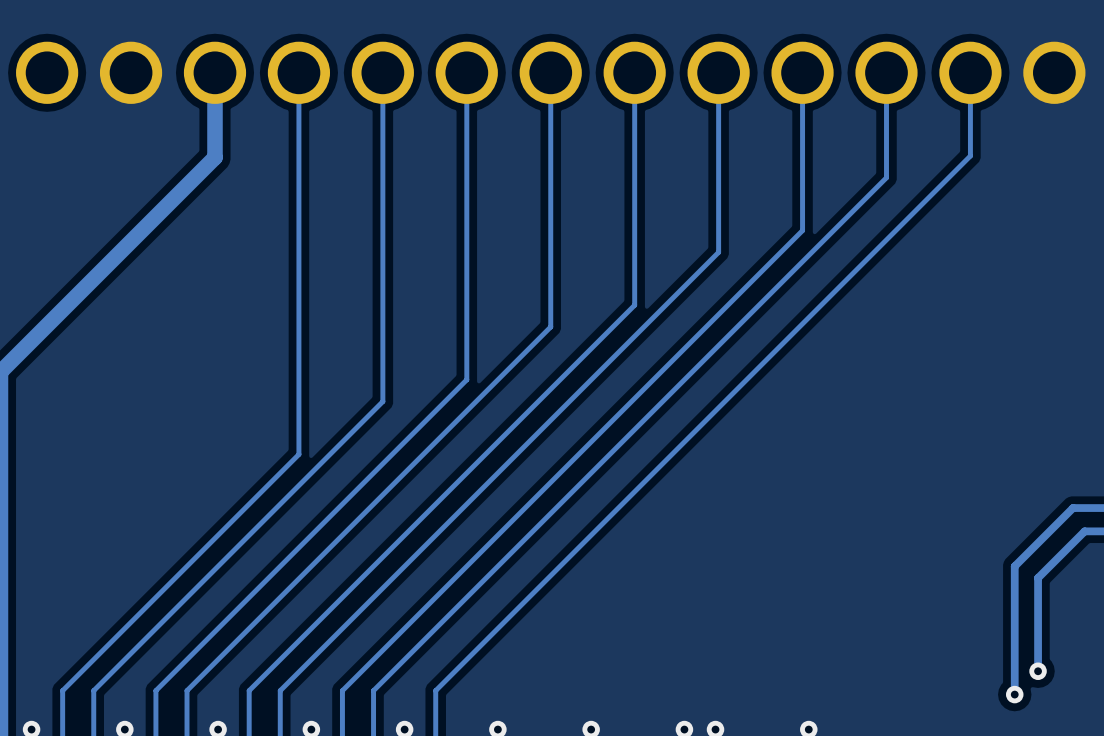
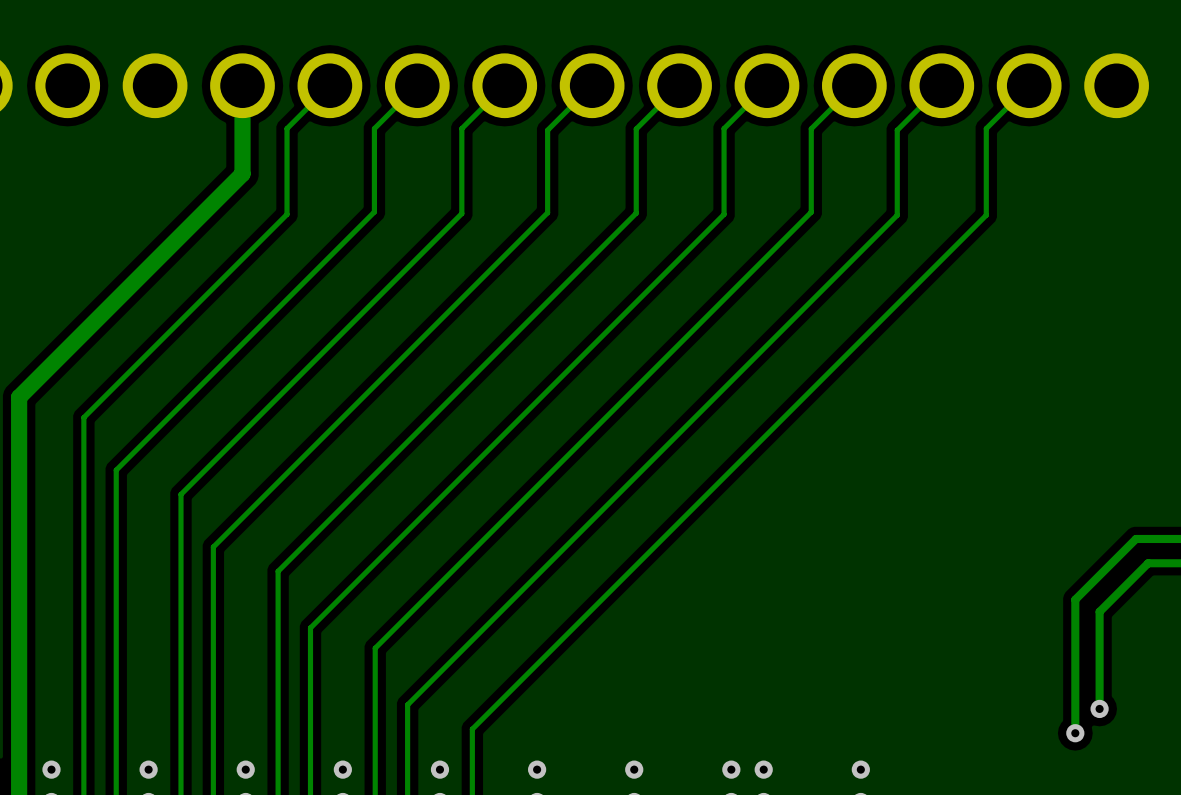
track: (298, 72) (298, 454) (62, 690) -> (329, 85) (287, 128) (287, 214) (83, 417) (83, 729)
track: (382, 72) (382, 401) (93, 690) -> (417, 85) (374, 128) (374, 212) (116, 470) (116, 729)
track: (466, 72) (466, 379) (155, 690) -> (504, 85) (461, 128) (461, 213) (180, 494) (180, 729)
track: (550, 72) (550, 326) (187, 690) -> (592, 85) (547, 130) (547, 212) (213, 547) (213, 729)
track: (634, 72) (634, 305) (249, 690) -> (679, 85) (636, 129) (636, 213) (278, 571) (278, 729)
track: (718, 72) (718, 252) (280, 690) -> (766, 85) (724, 128) (724, 214) (310, 628) (310, 729)
track: (802, 72) (802, 230) (342, 690) -> (854, 85) (811, 128) (811, 212) (375, 648) (375, 729)
track: (886, 72) (886, 177) (373, 690) -> (941, 85) (897, 130) (897, 215) (407, 704) (407, 729)
track: (970, 72) (970, 155) (929, 197) -> (1029, 85) (986, 128) (986, 215)

